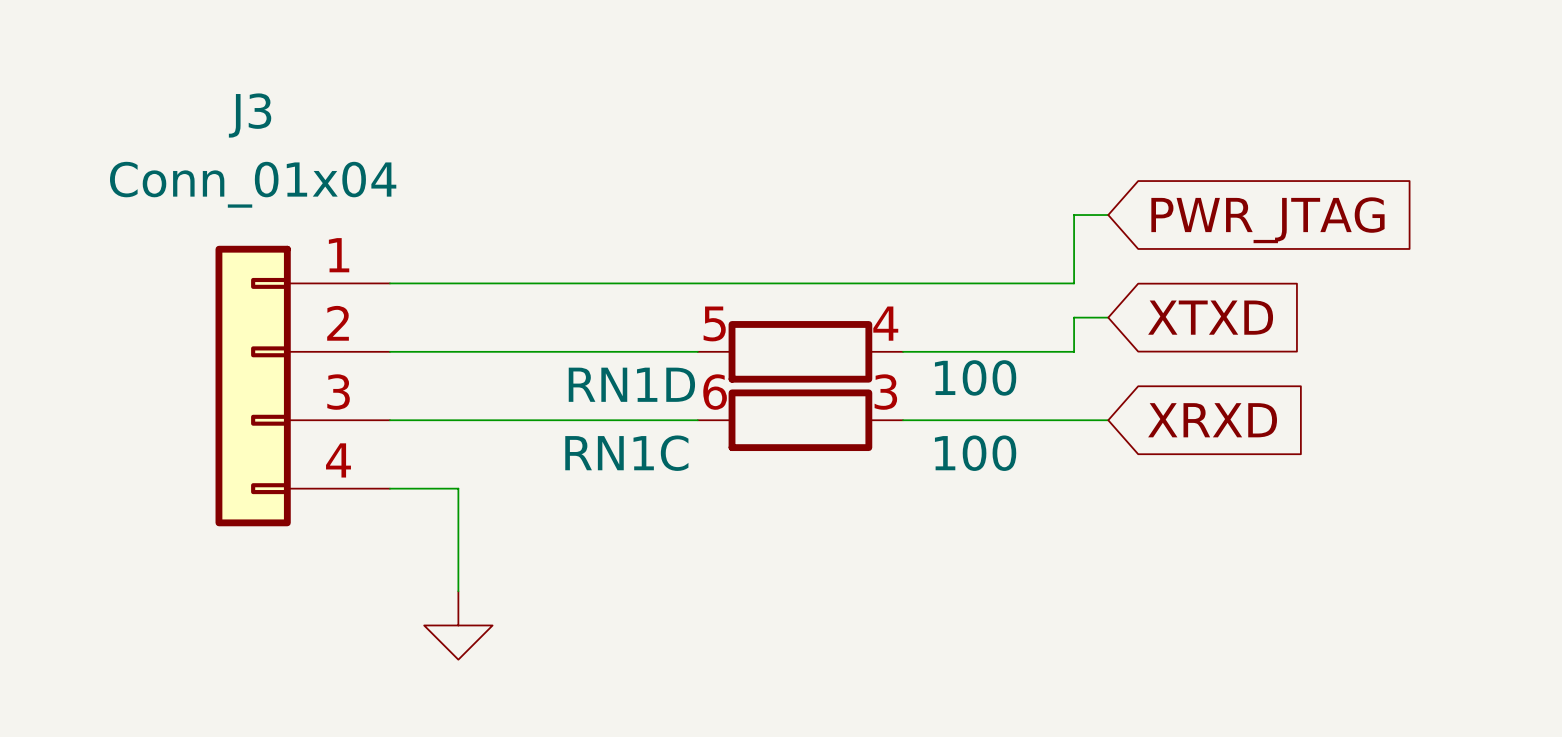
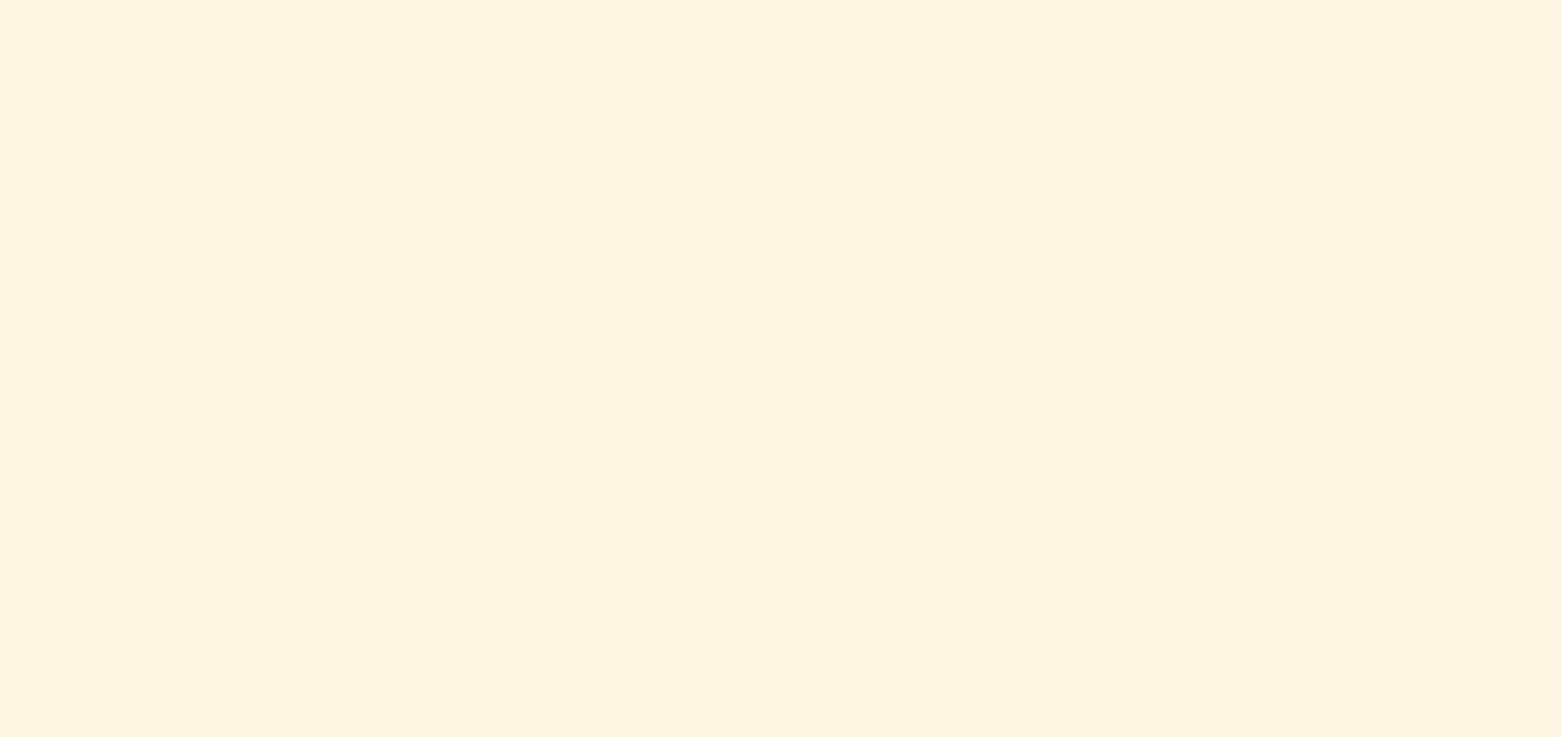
wire: (1108, 215) (1074, 215) (1074, 283) (389, 283) -> none
global label: PWR_JTAG (1267, 220) -> none
wire: (1108, 317) (1074, 317) (1074, 351) (903, 351) -> none
global label: XTXD (1210, 317) -> none
wire: (389, 351) (697, 351) -> none
RN1D: 100 (800, 351) -> none
J3: Conn_01x04 (302, 386) -> none
wire: (389, 420) (697, 420) -> none
RN1C: 100 (800, 420) -> none
wire: (903, 420) (1108, 420) -> none
global label: XRXD (1212, 420) -> none
wire: (389, 488) (458, 488) (458, 591) -> none
power symbol: (458, 625) -> none

